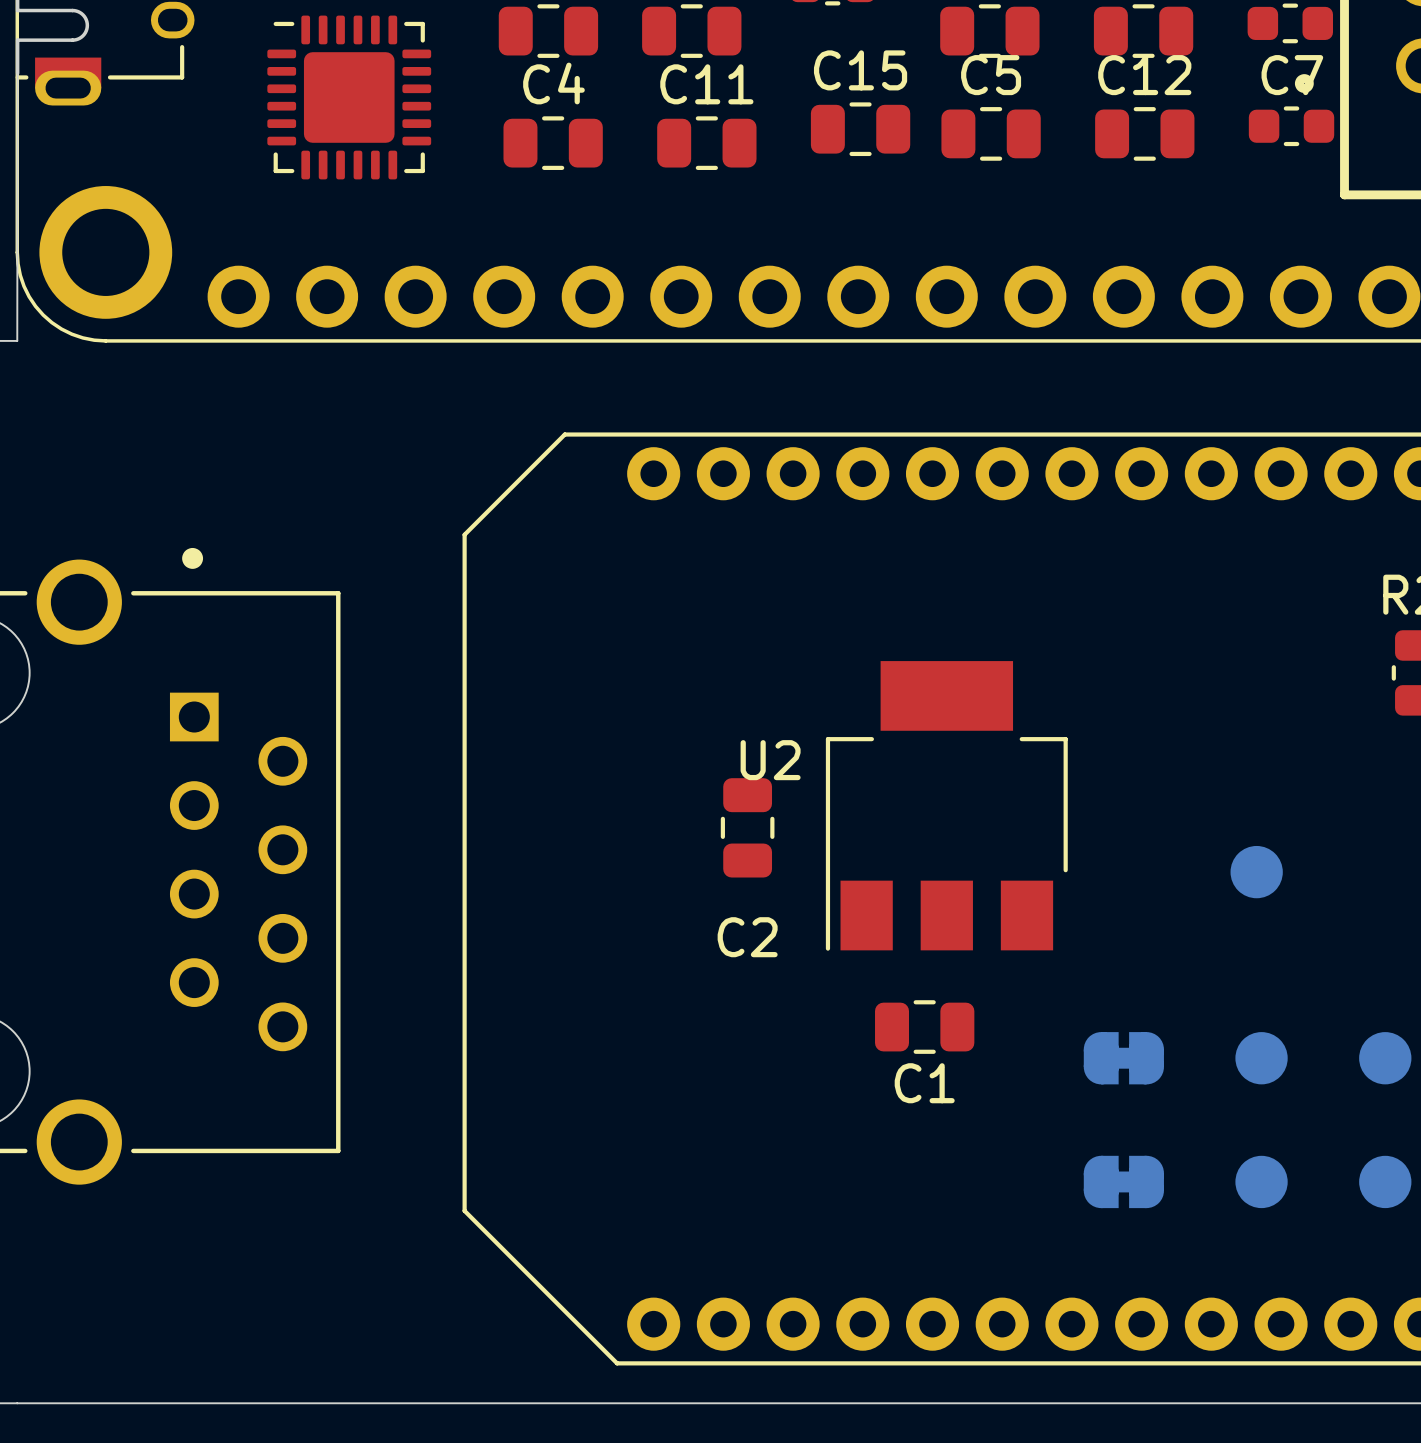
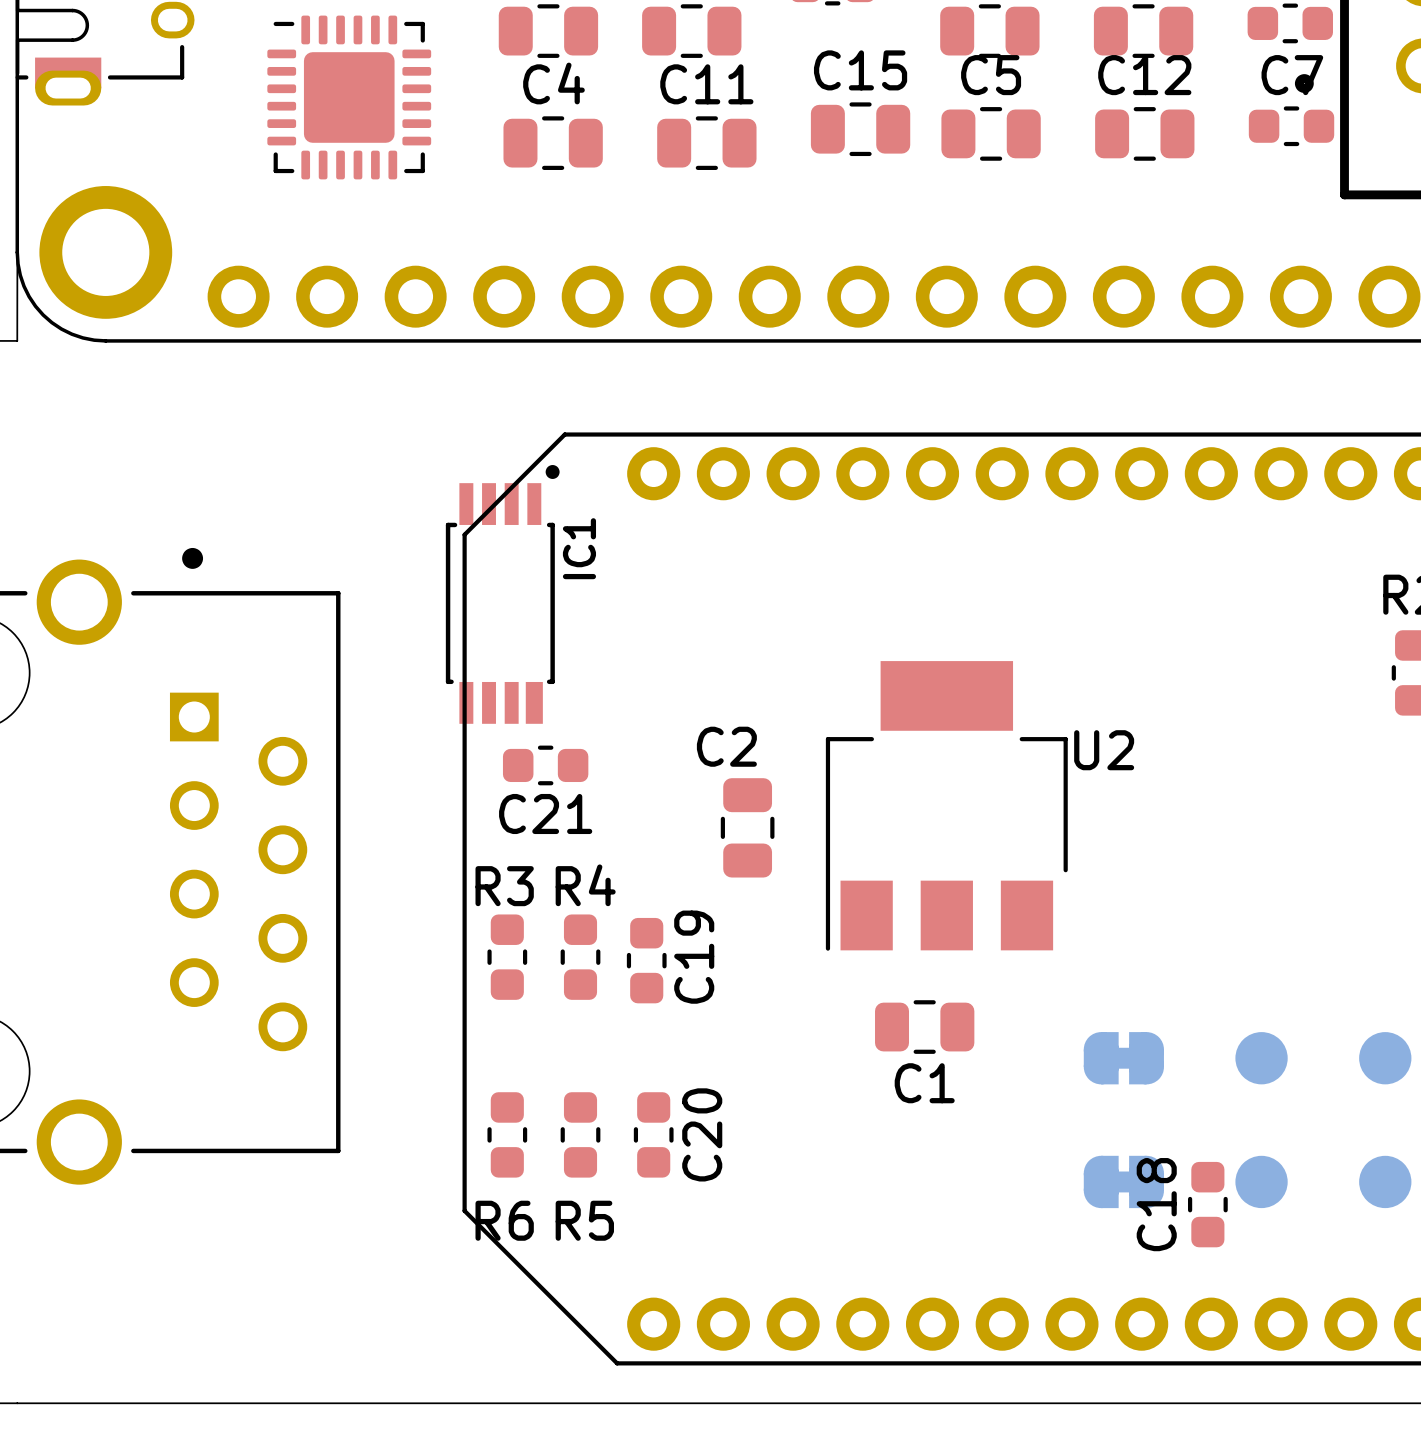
IC1: none -> (502, 594)
U2 name position: U2 (770, 760) -> U2 (1104, 750)
C21: none -> (545, 765)
part: (1256, 872) -> none
C2 name position: C2 (747, 937) -> C2 (726, 746)
R3: none -> (507, 957)
R4: none -> (580, 957)
C19: none -> (646, 960)
R6: none -> (507, 1134)
R5: none -> (580, 1134)
C20: none -> (653, 1134)
C18: none -> (1207, 1204)

